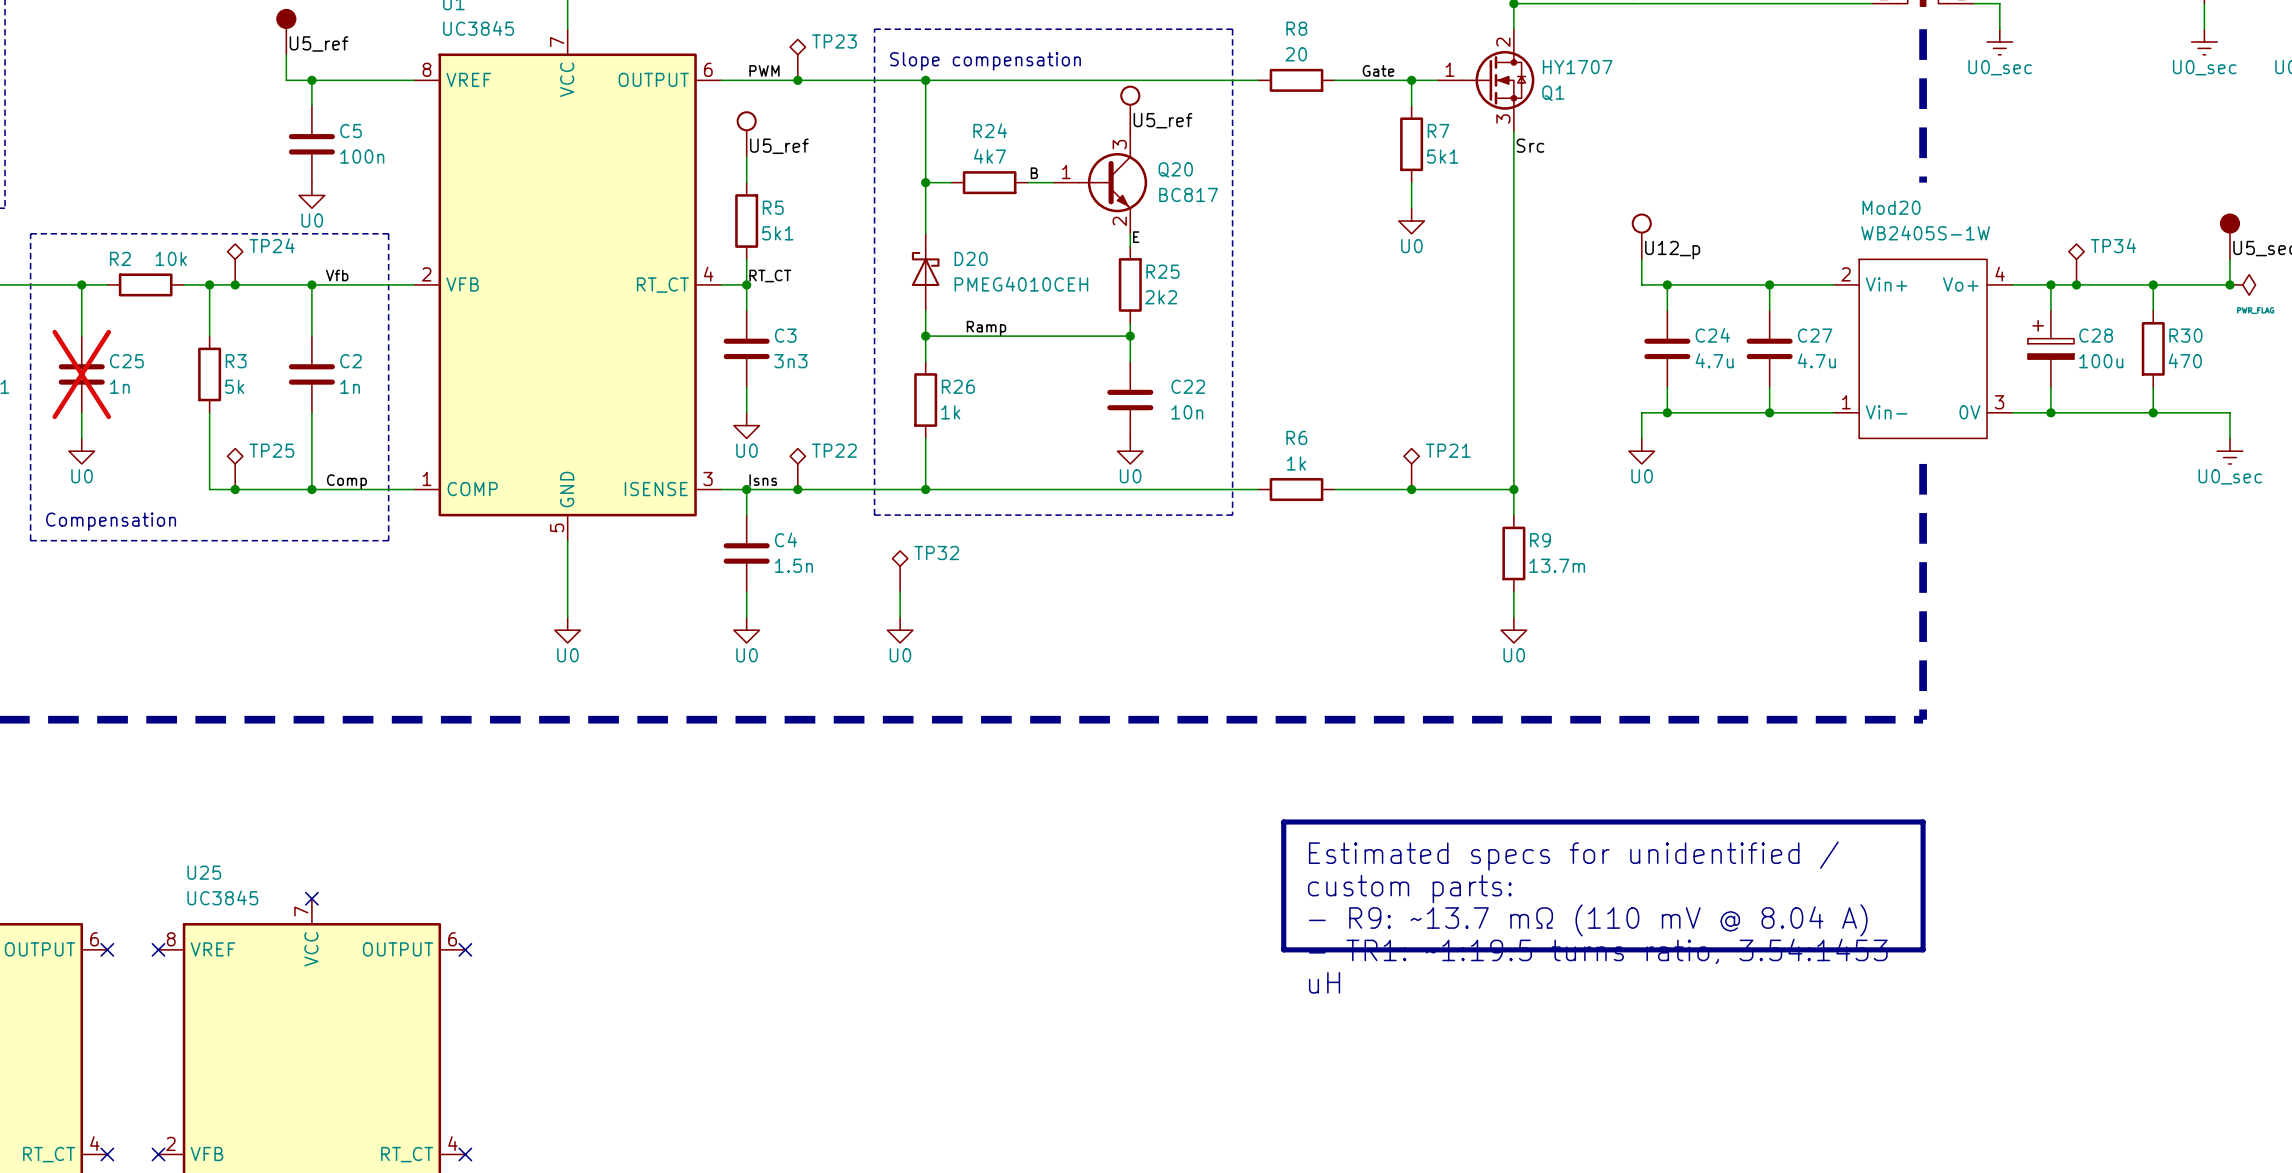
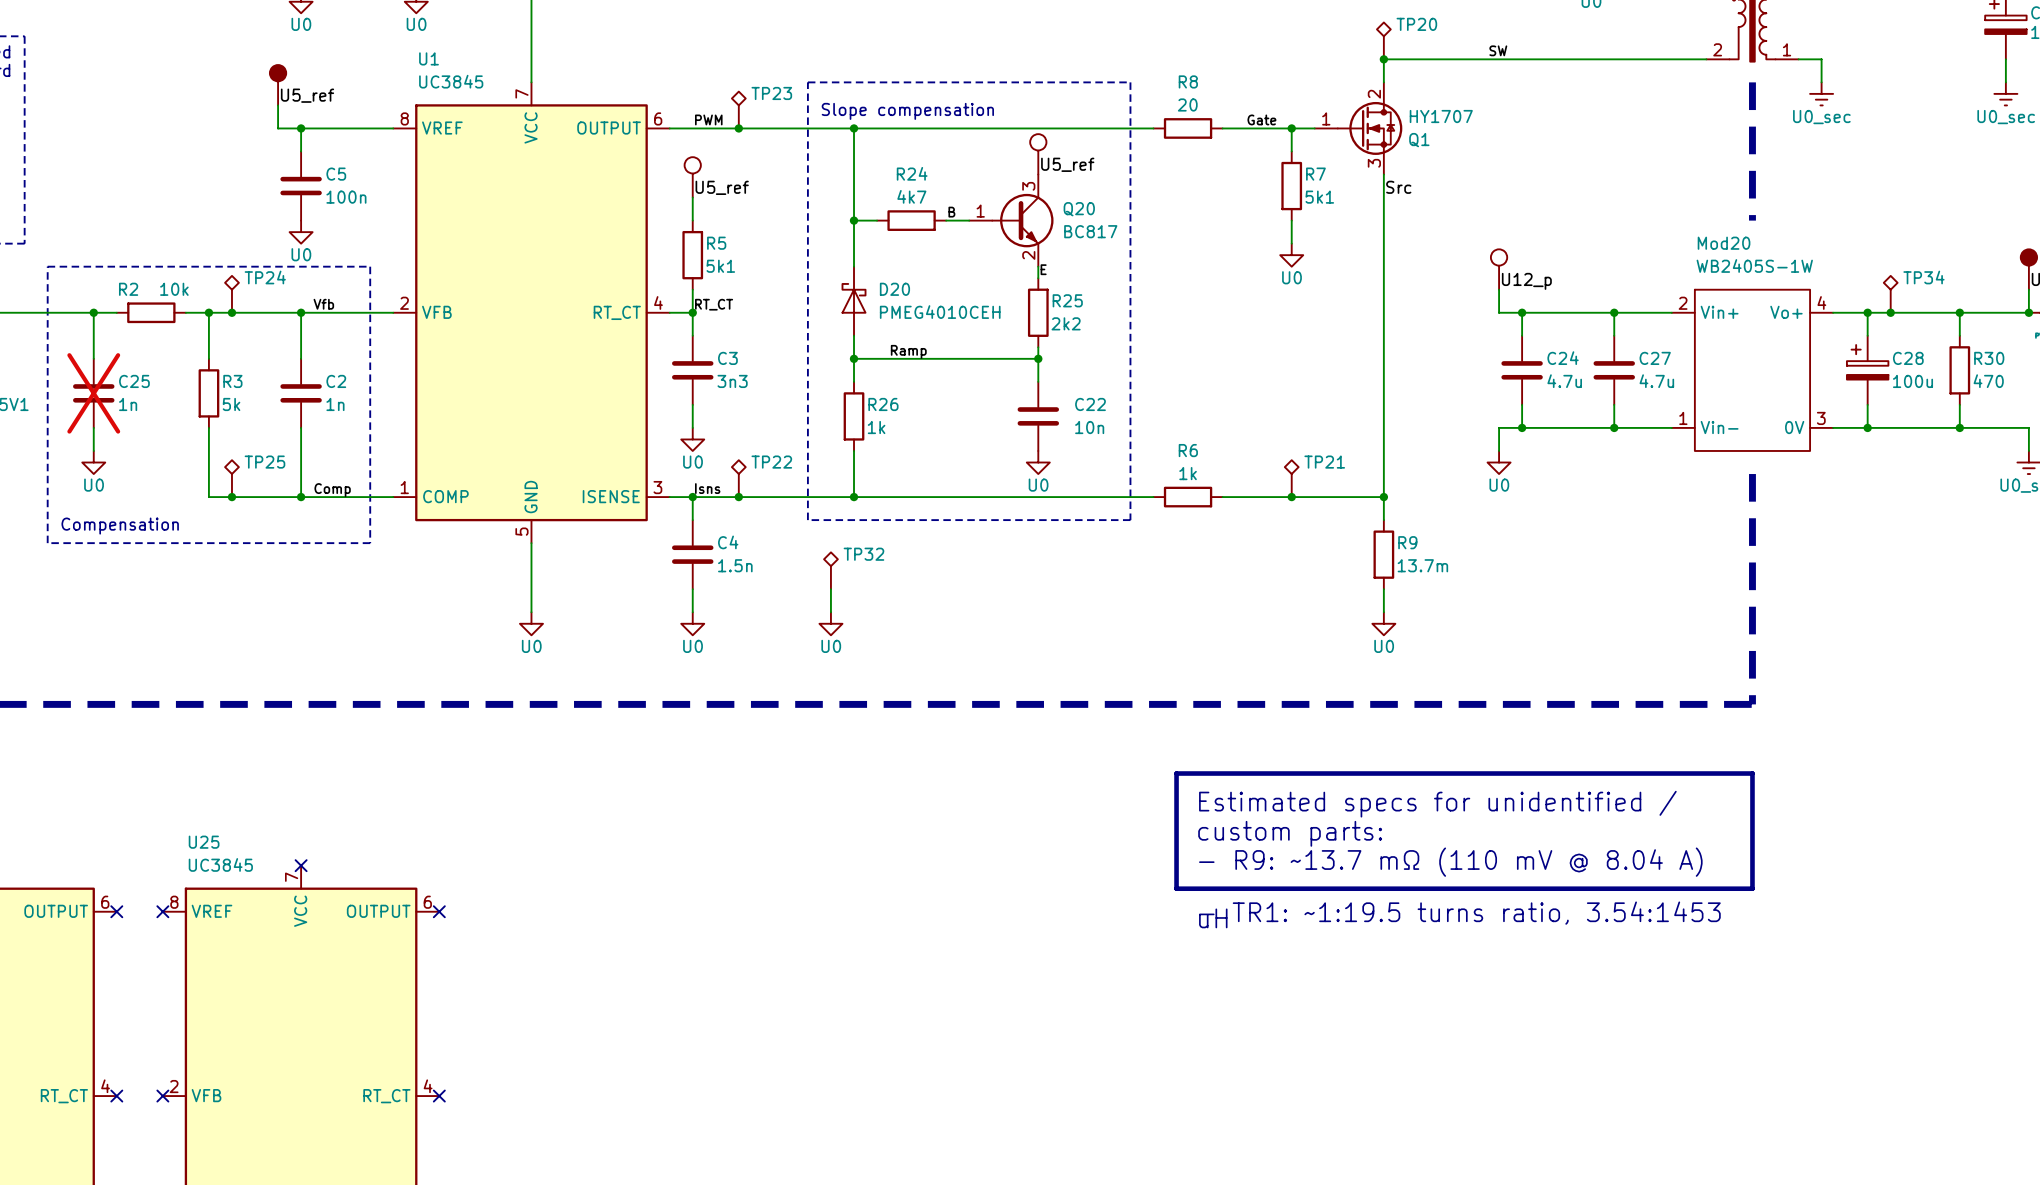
line: (1283, 822) (1923, 822) -> (1176, 796) (1176, 773) (1752, 773) (1752, 796)
text position: Estimated specs for unidentified / (1573, 856) -> Estimated specs for unidentified / (1437, 804)
text position: custom parts: (1409, 888) -> custom parts: (1290, 833)
text position: - R9: ~13.7 mΩ (110 mV @ 8.04 A) (1588, 920) -> - R9: ~13.7 mΩ (110 mV @ 8.04 A) (1450, 862)
line: (1283, 924) (1283, 949) (1923, 949) (1923, 924) -> (1176, 888) (1752, 888)
text position: uH (1324, 982) -> uH (1213, 918)

